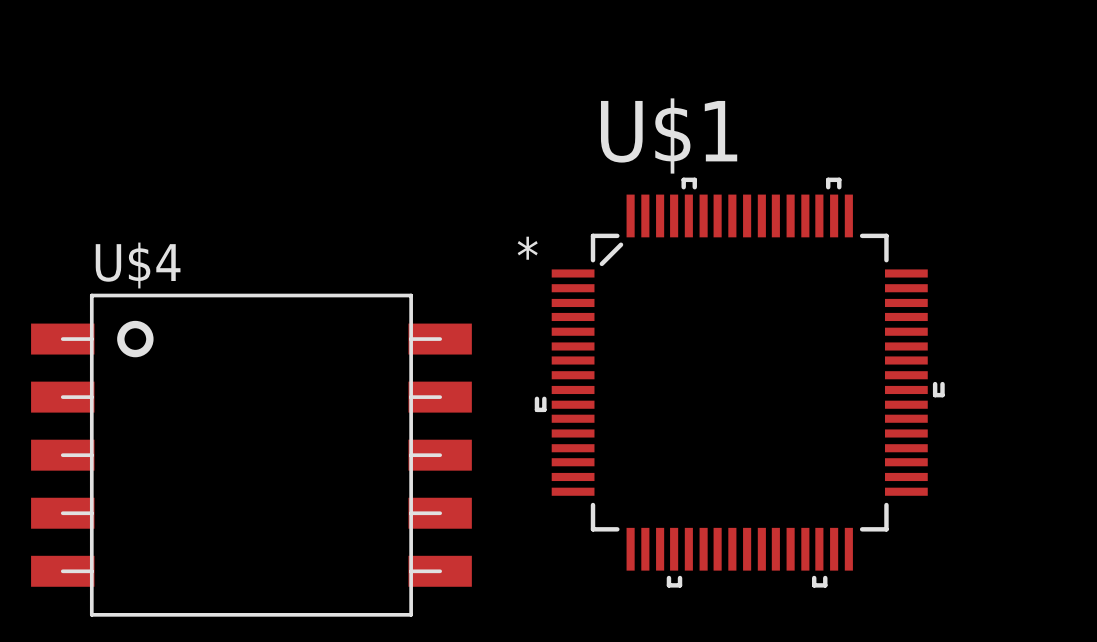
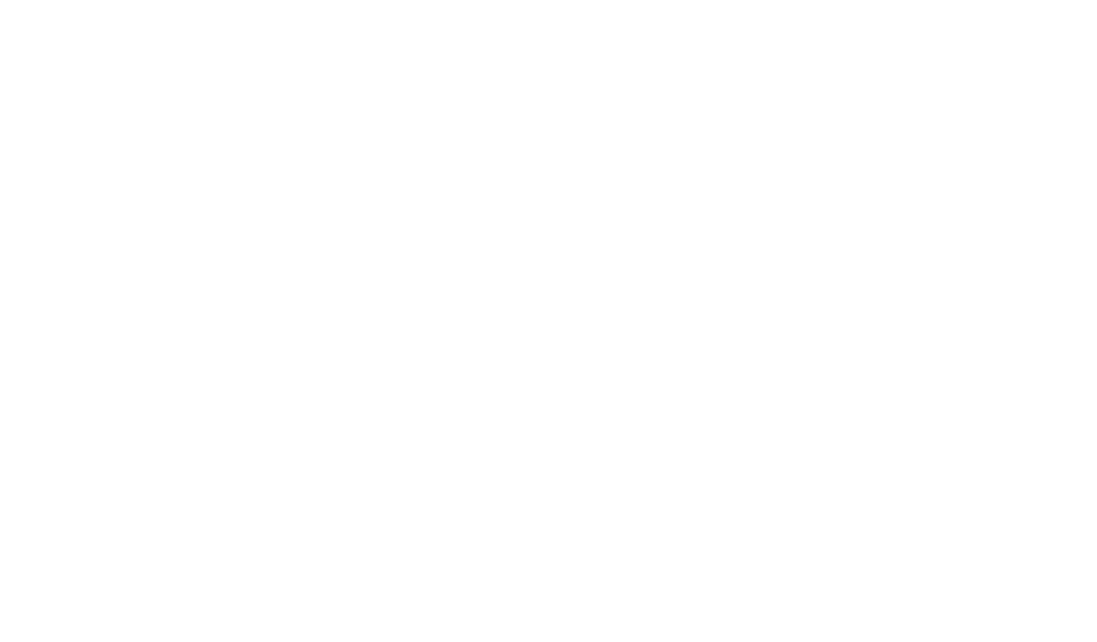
U$1: (739, 382) -> none
U$4: (251, 455) -> none

